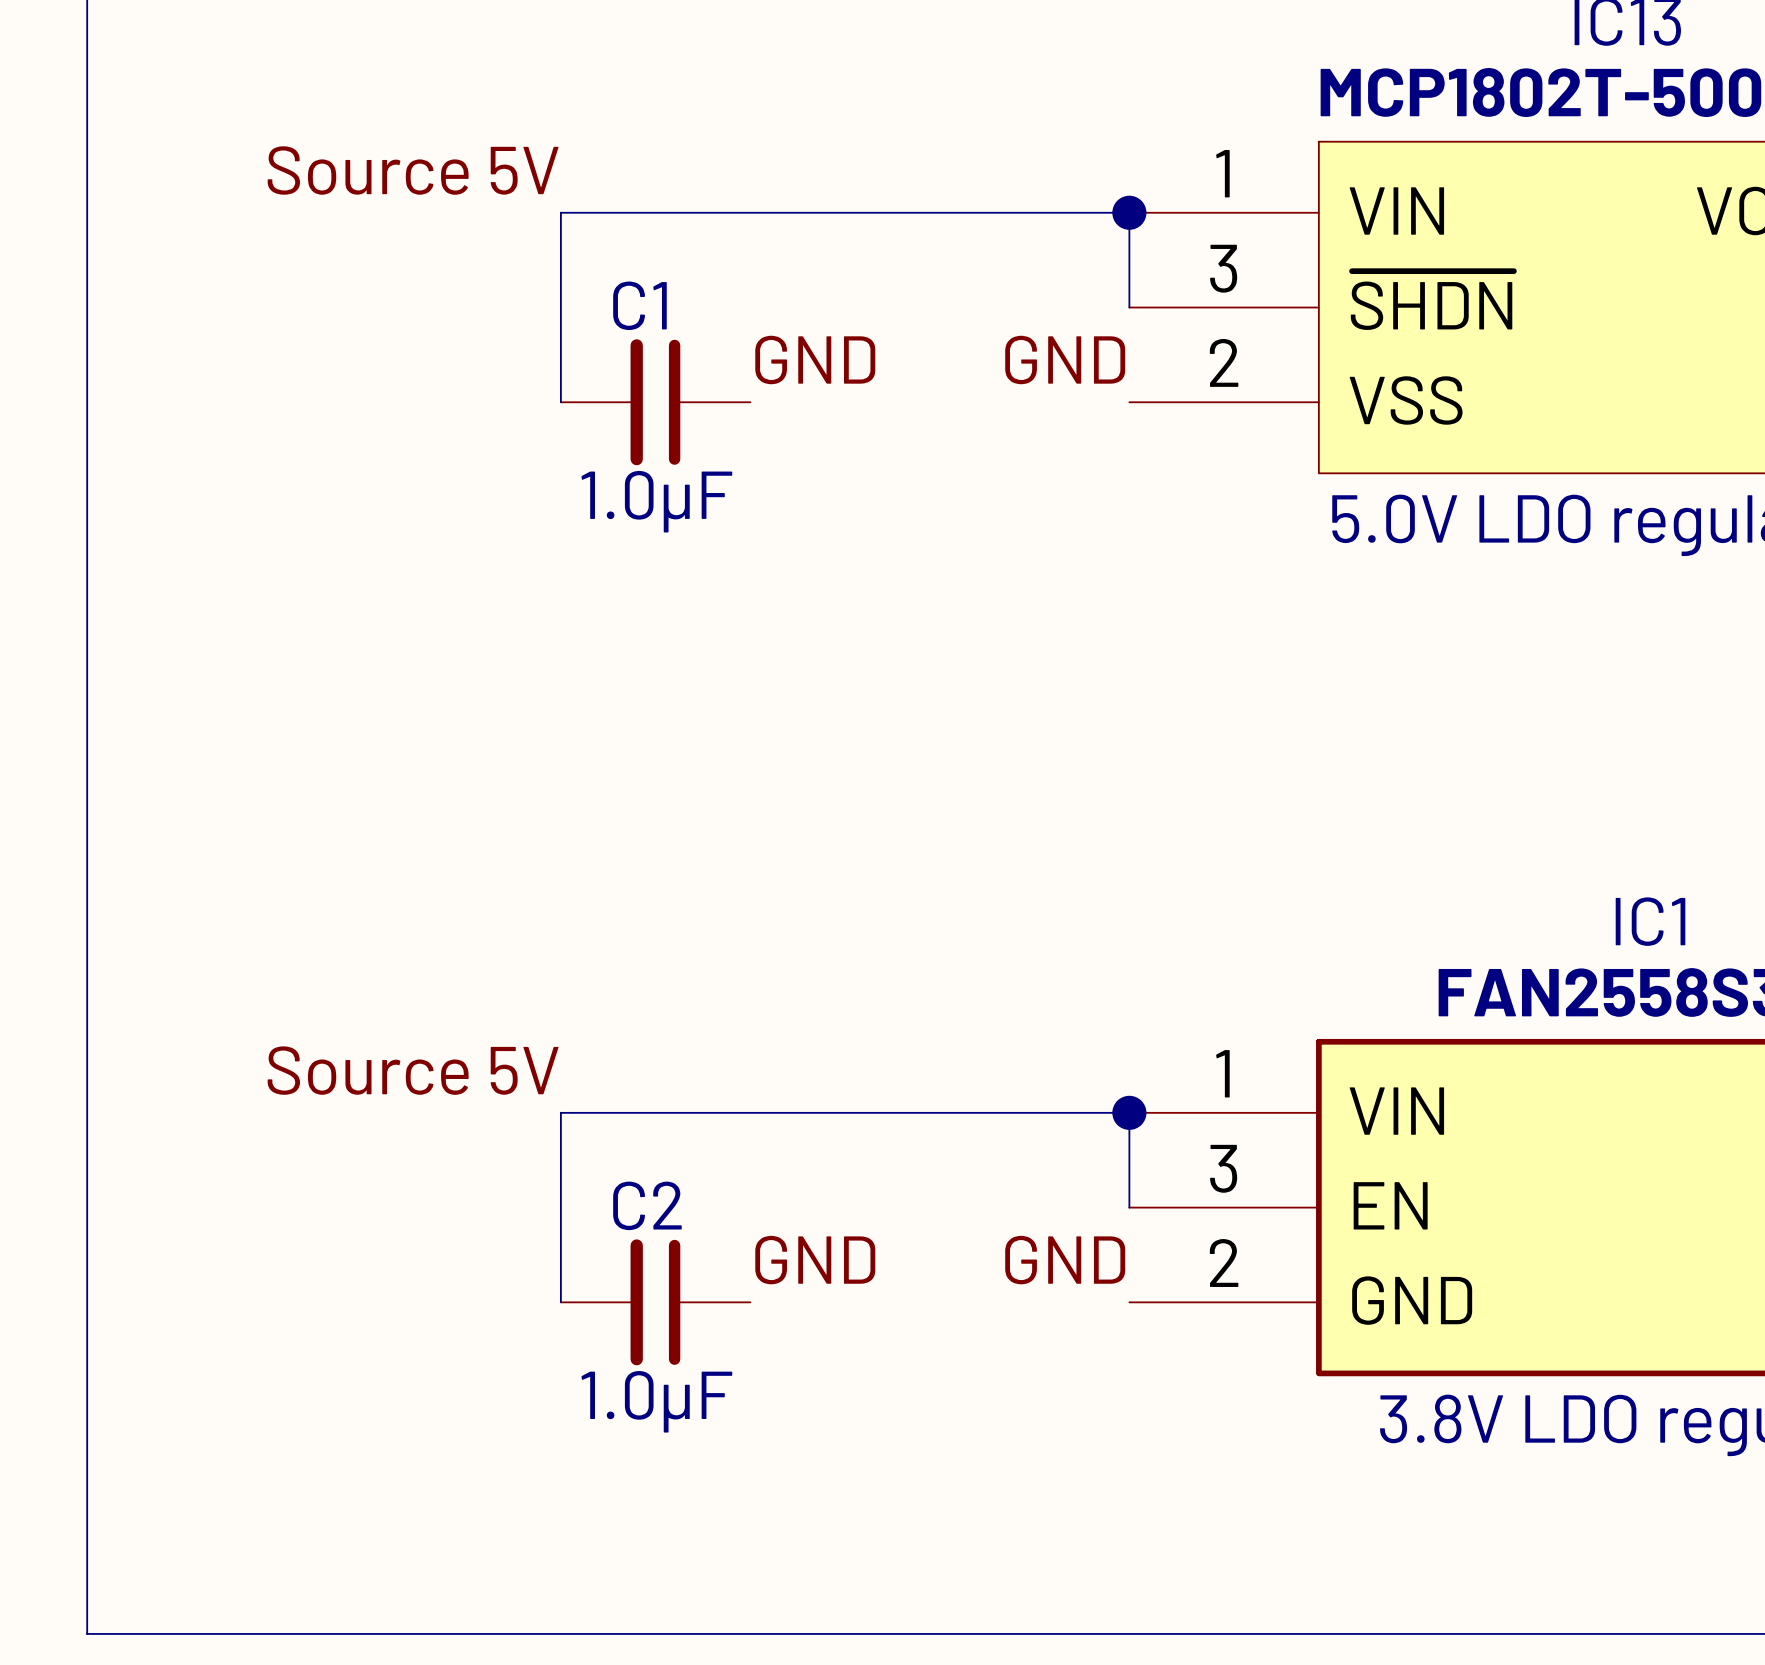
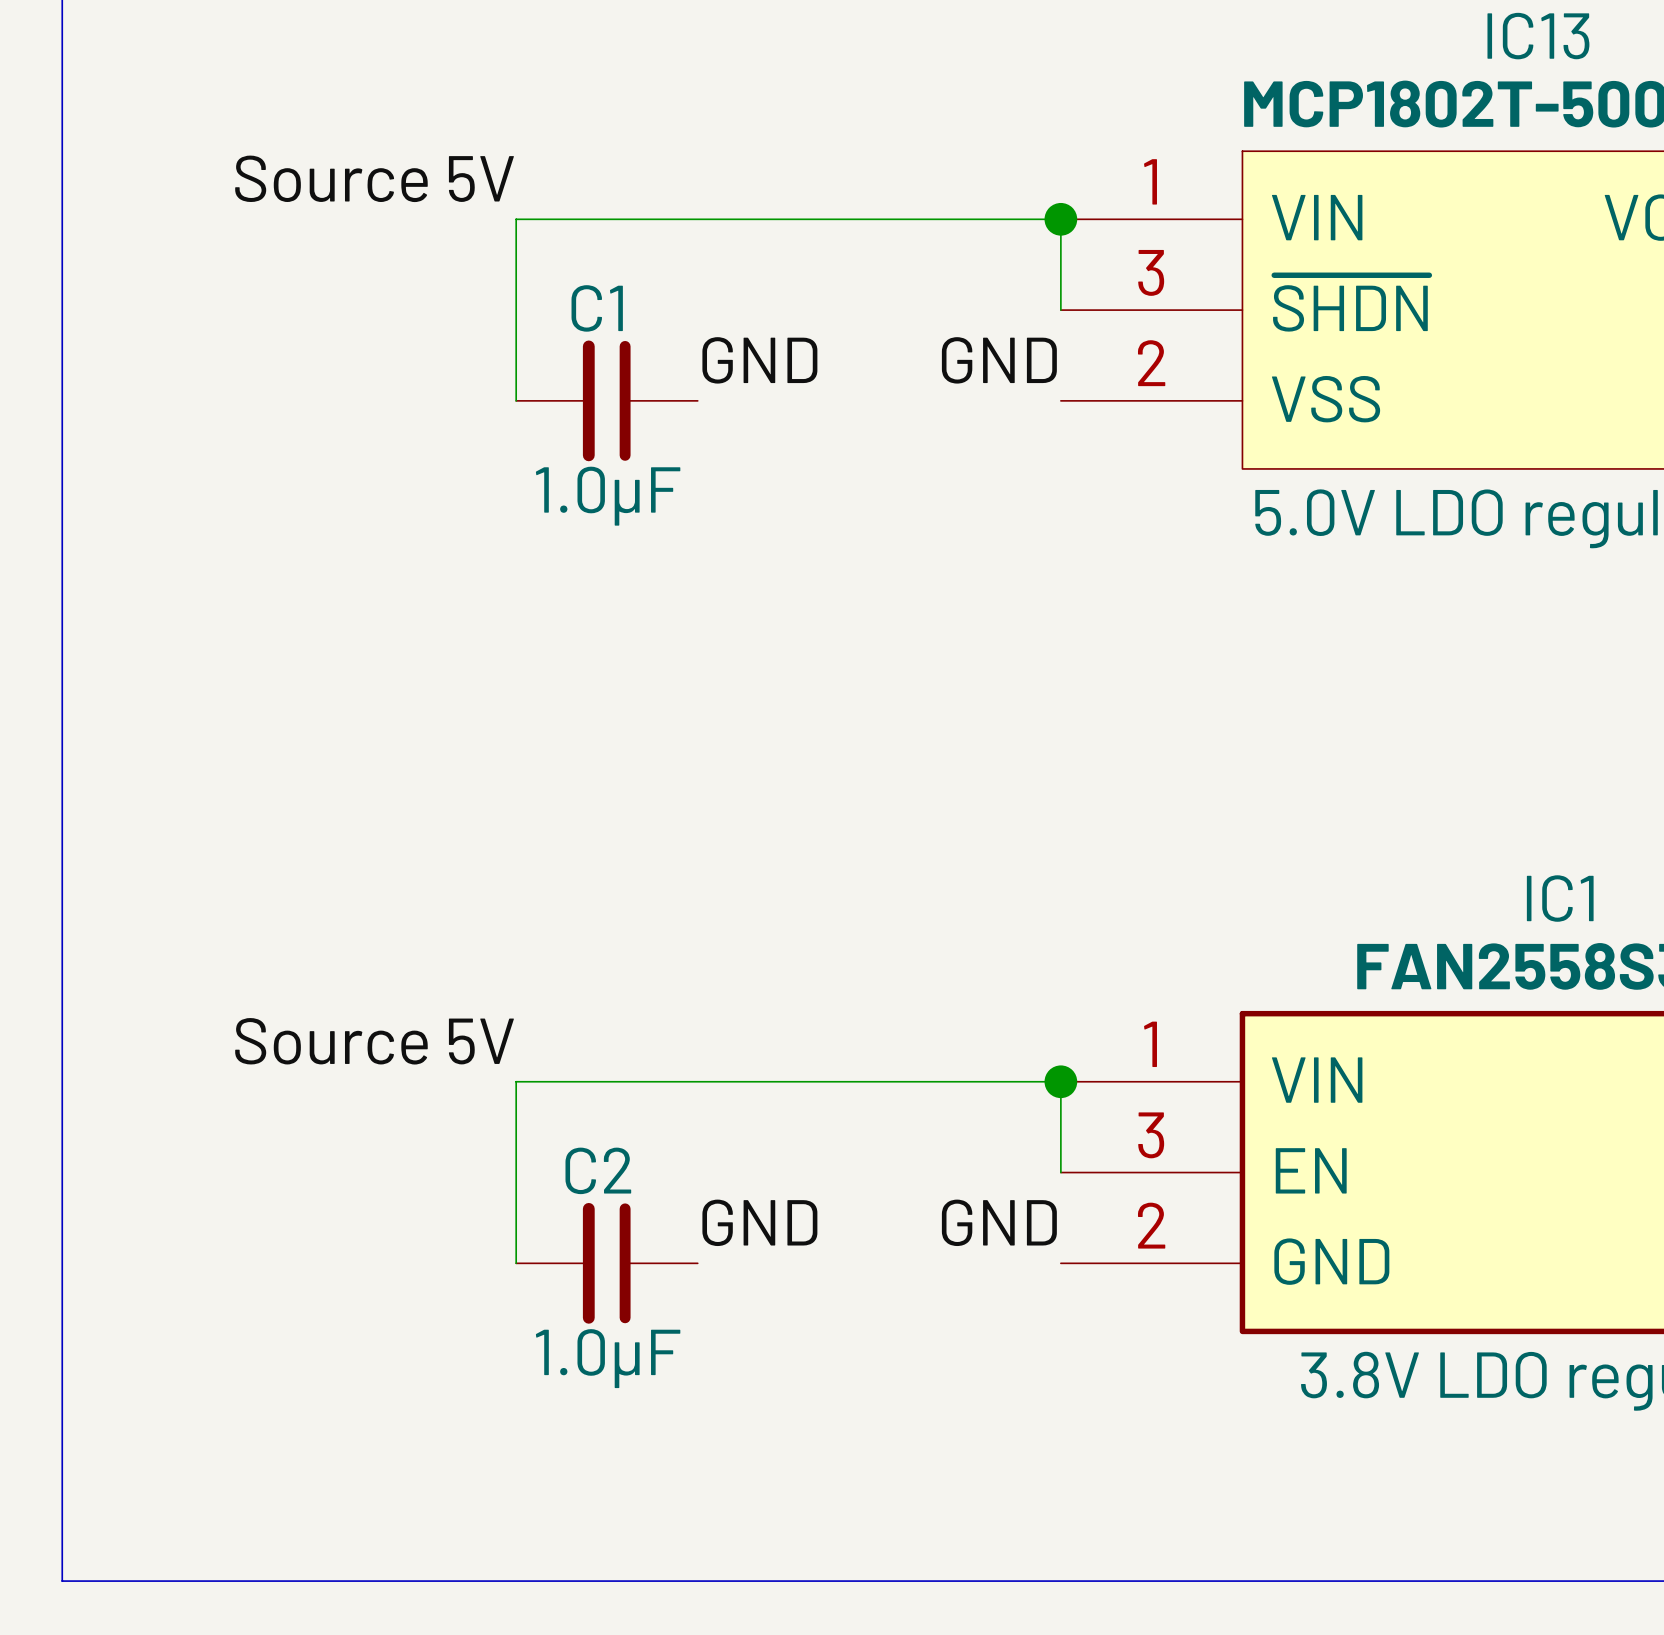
C1 name position: C1 (639, 305) -> C1 (597, 308)
C2 name position: C2 (647, 1205) -> C2 (598, 1170)

